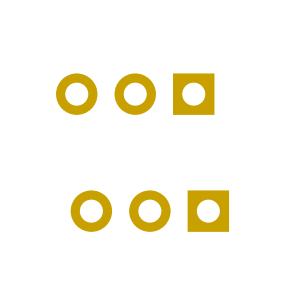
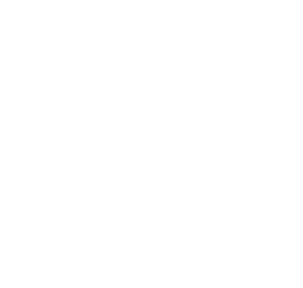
part: (135, 94) -> none
part: (149, 211) -> none

